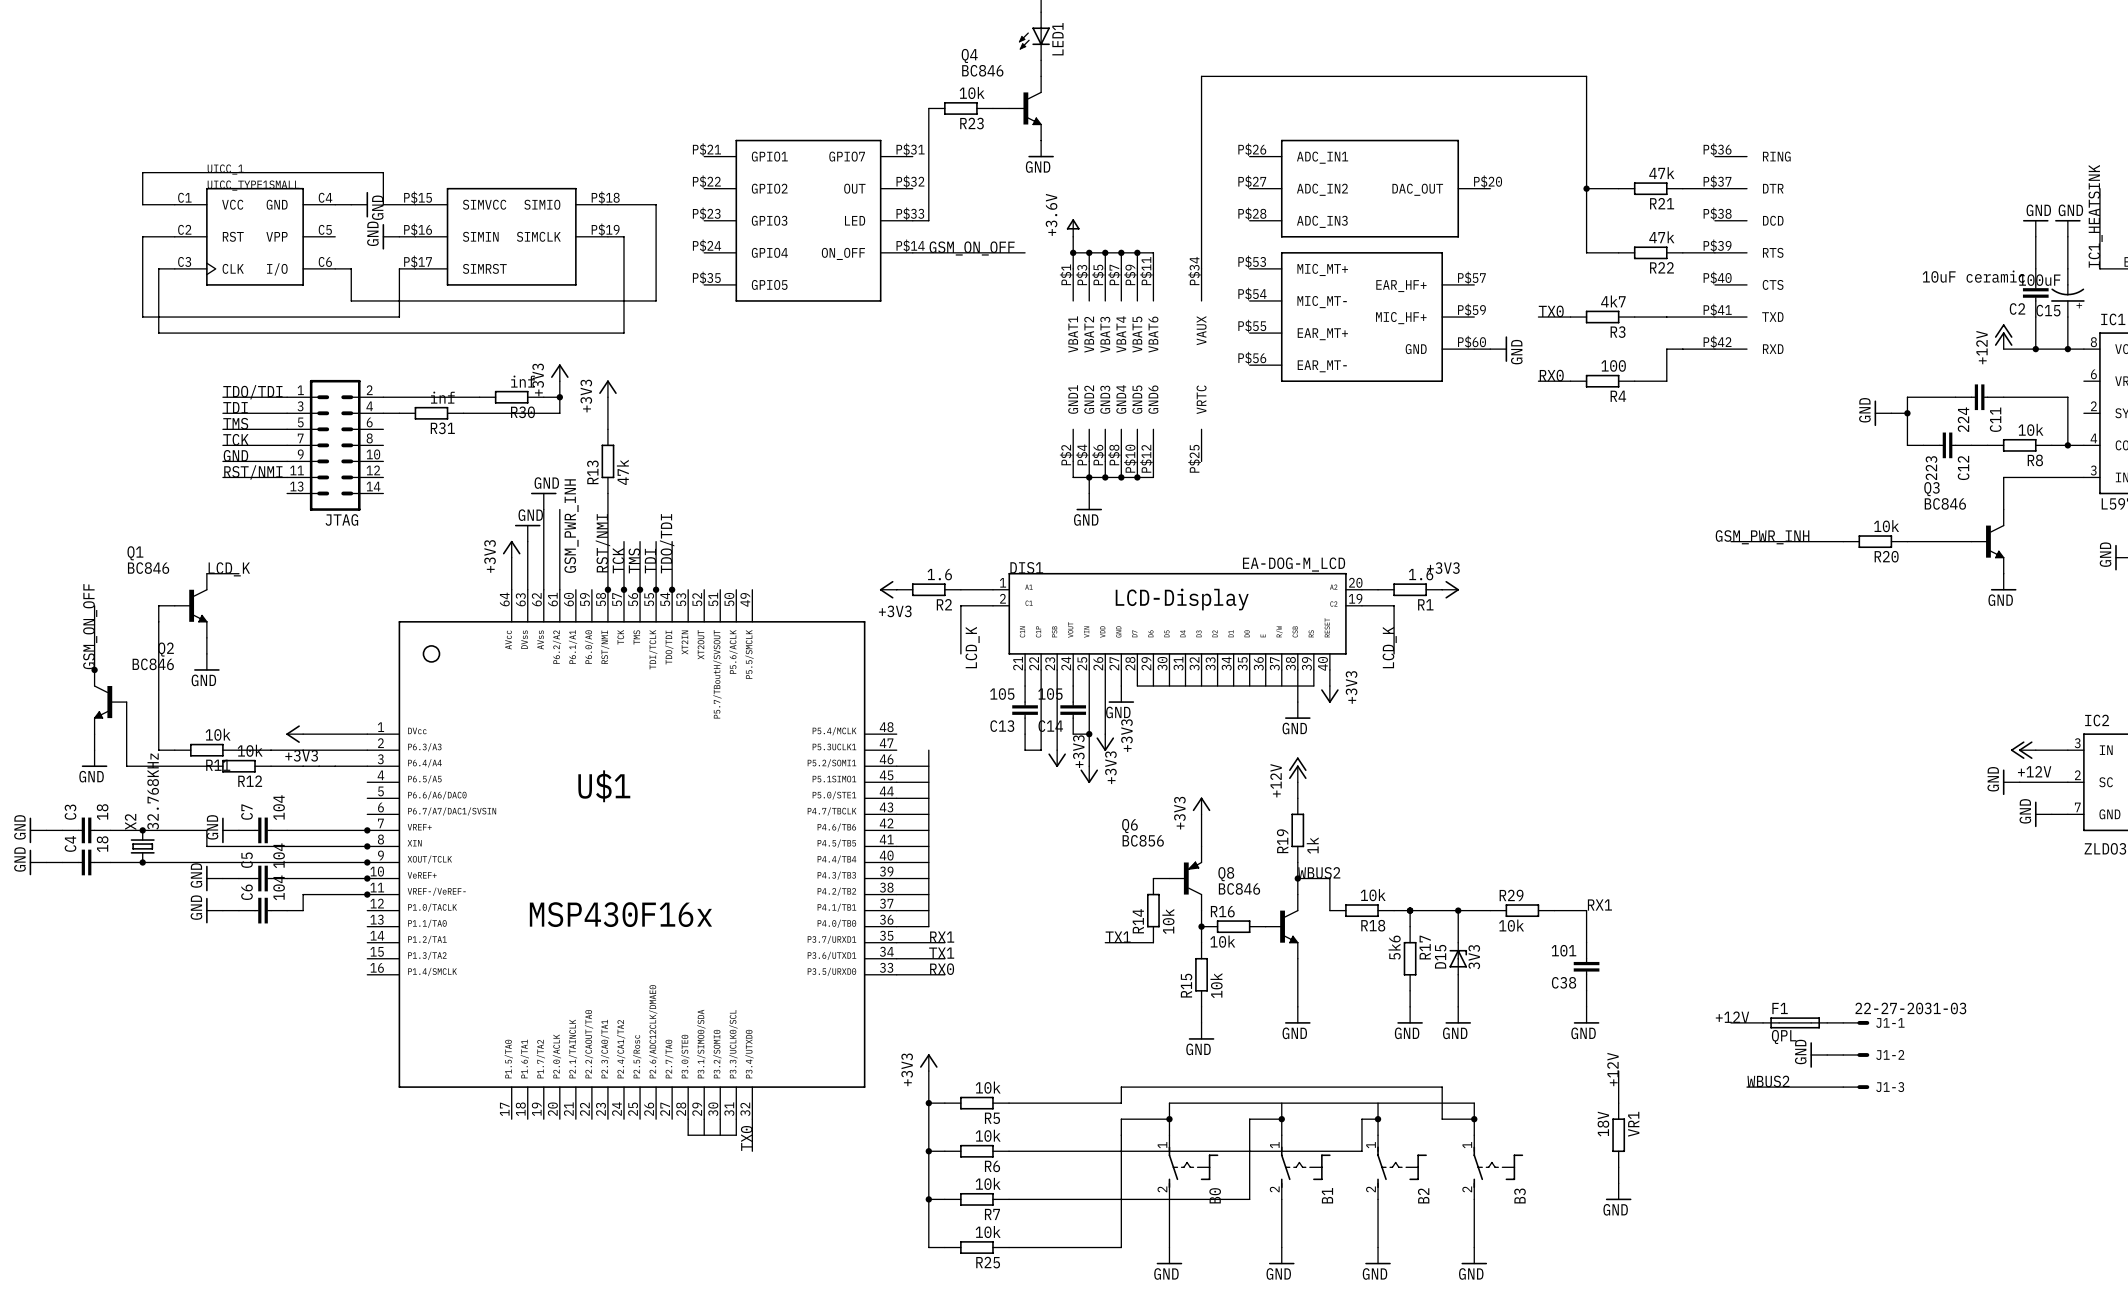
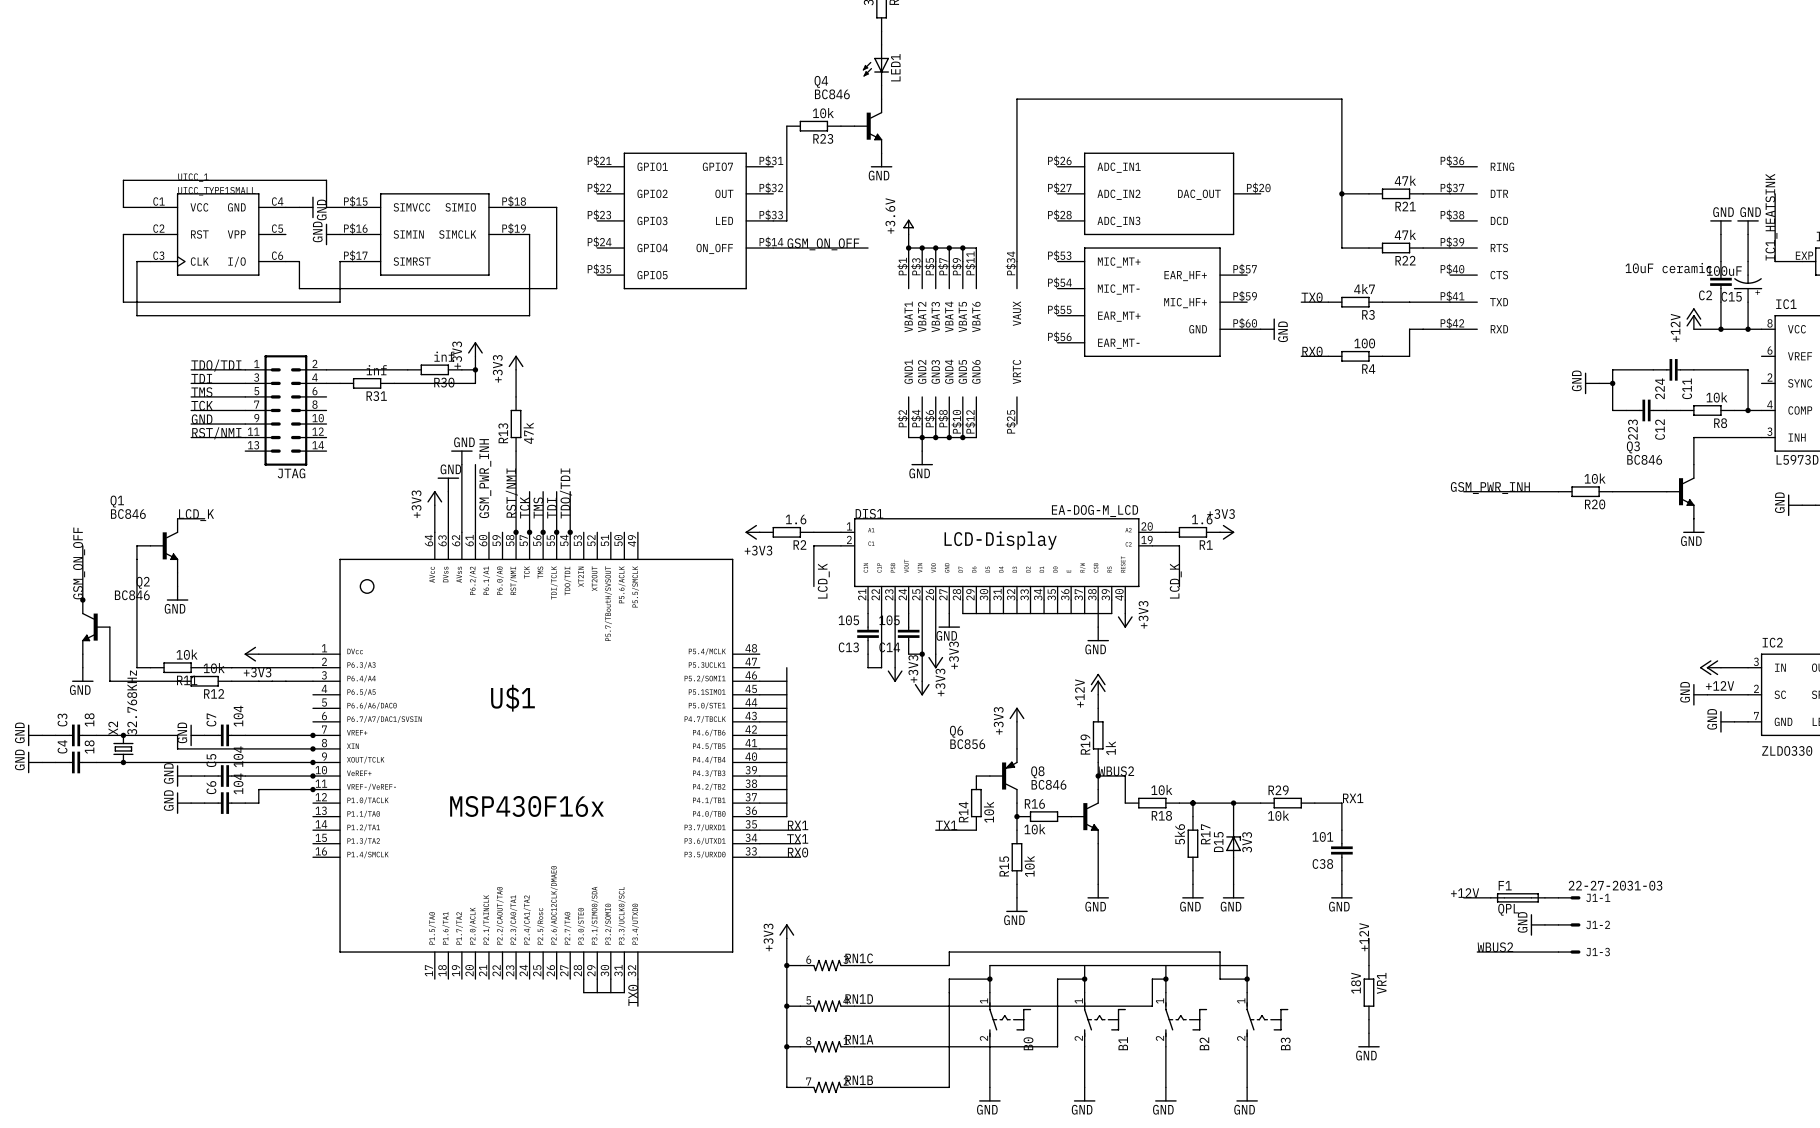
R5: 10k (976, 1103) -> none
RN1C: none -> (827, 965)
R6: 10k (976, 1151) -> none
RN1D: none -> (827, 1006)
R7: 10k (976, 1199) -> none
RN1A: none -> (827, 1046)
R25: 10k (976, 1247) -> none
RN1B: none -> (827, 1087)

